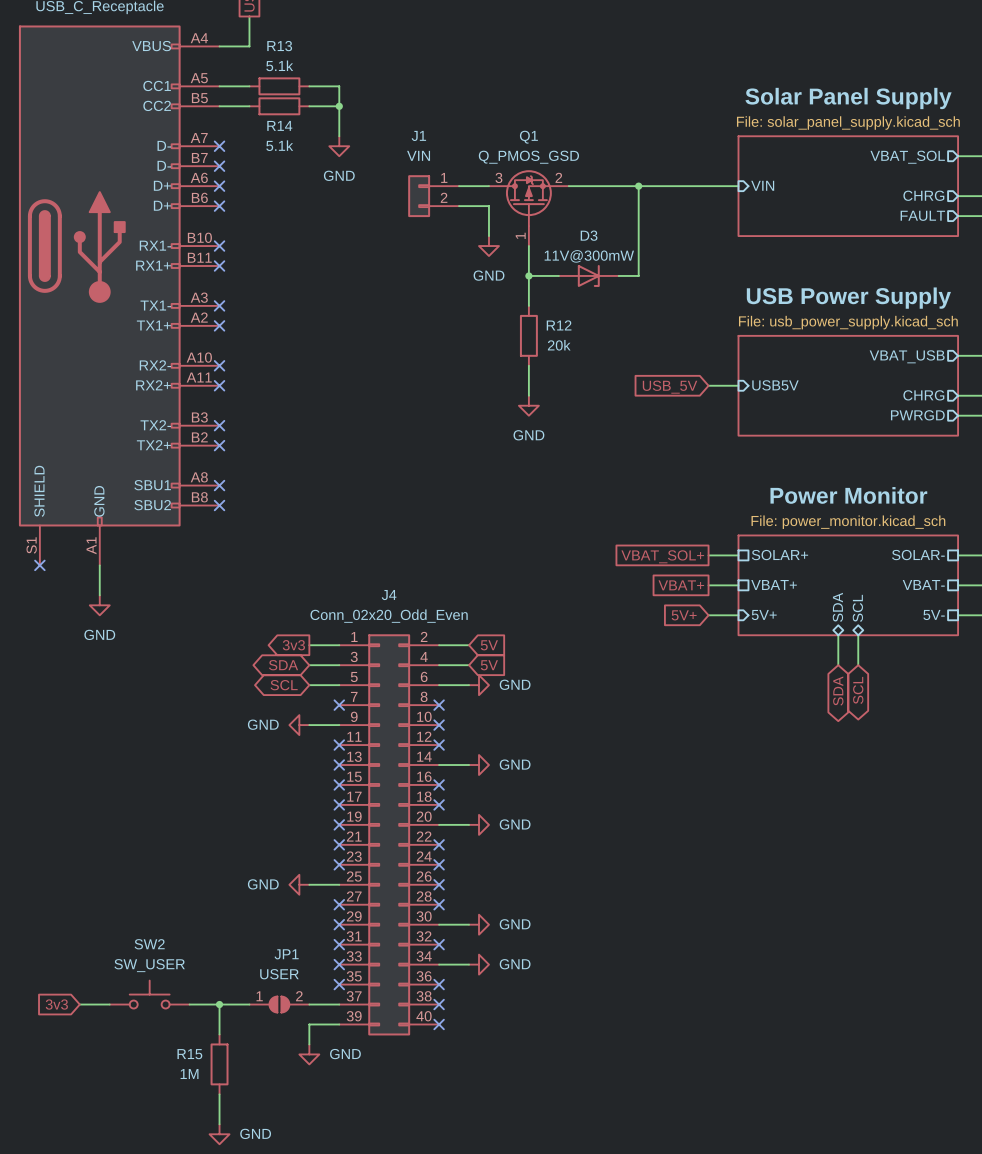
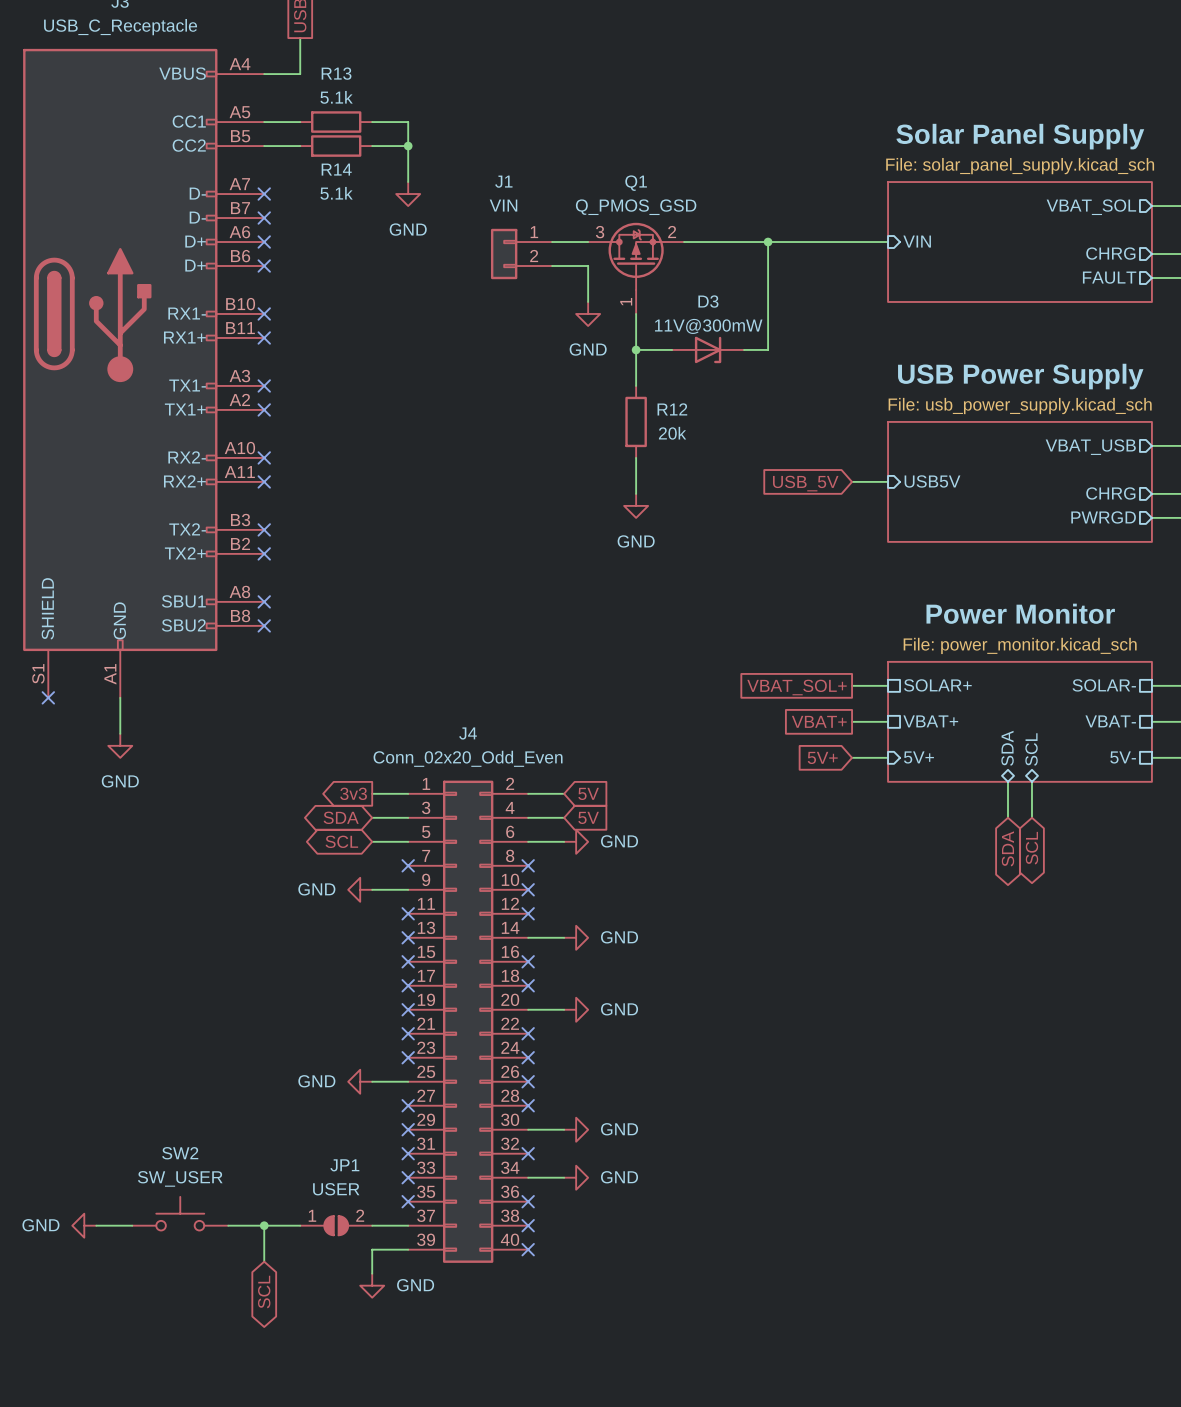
global label: 3v3 (56, 1004) -> none
power symbol: none -> GND (84, 1225)
global label: none -> SCL (264, 1292)
R15: 1M (219, 1064) -> none
wire: (219, 1094) (219, 1124) -> none
power symbol: GND (219, 1134) -> none

